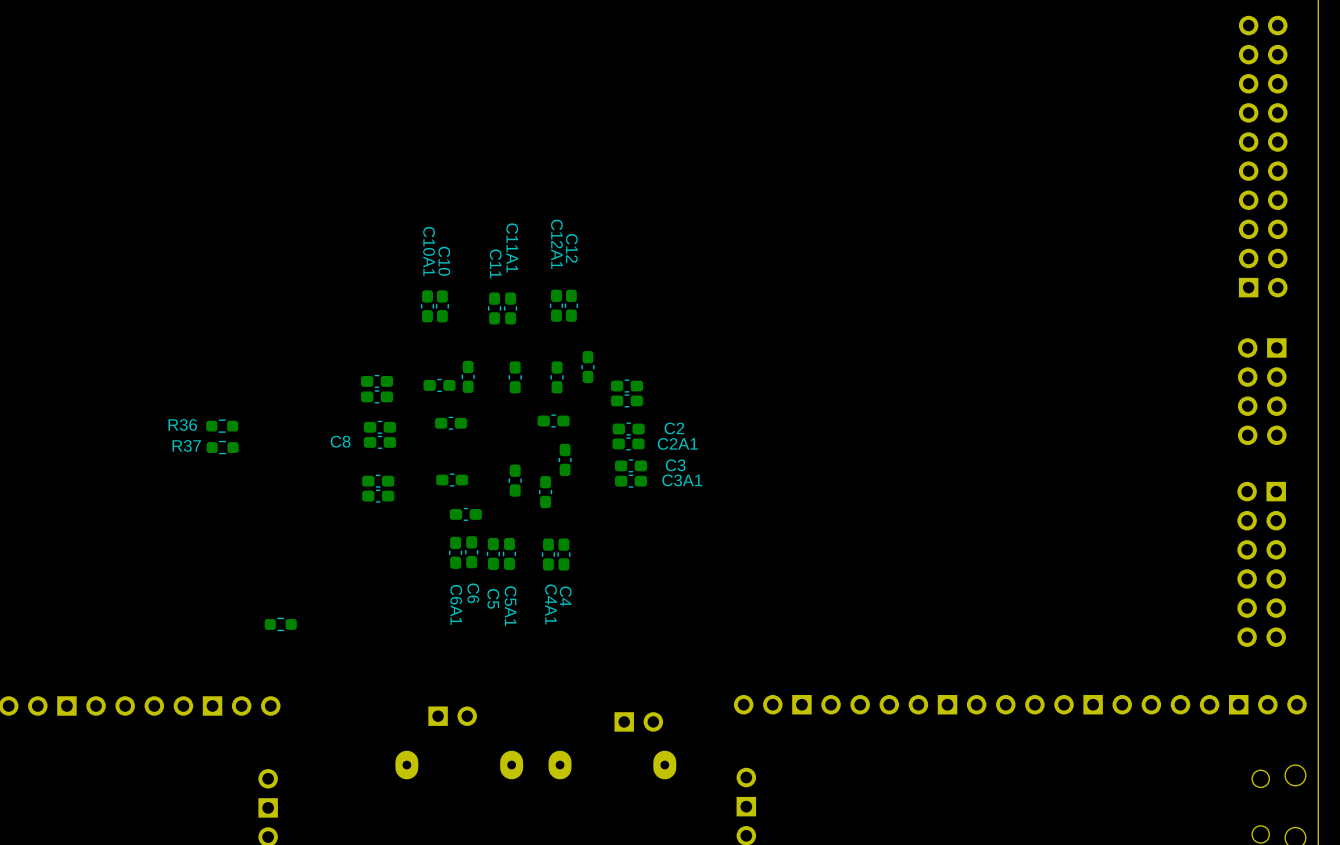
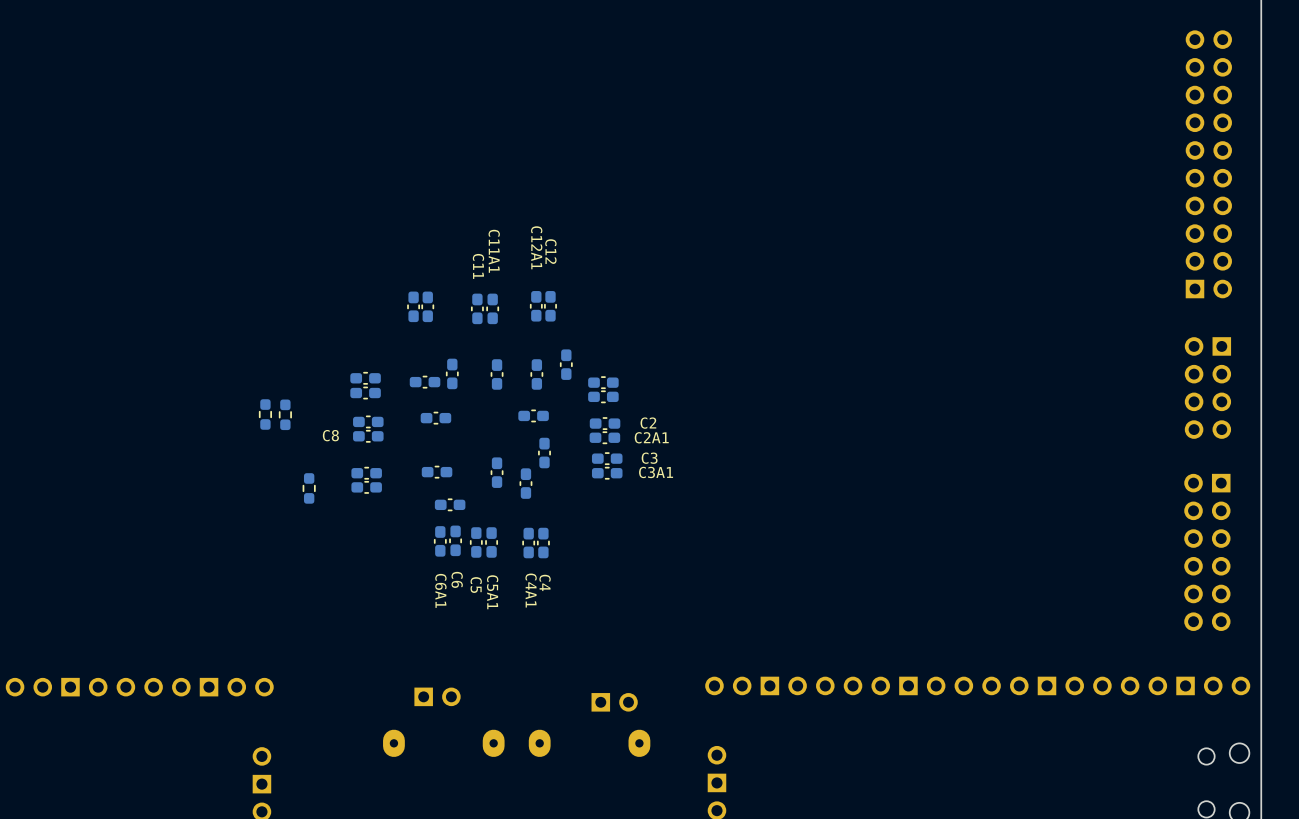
C10A1 name: C10A1 (429, 251) -> none
C10 name: C10 (444, 261) -> none
part: none -> (265, 414)
part: none -> (285, 414)
R36: (222, 426) -> none
R37: (222, 447) -> none
part: none -> (309, 488)
part: (280, 624) -> none

